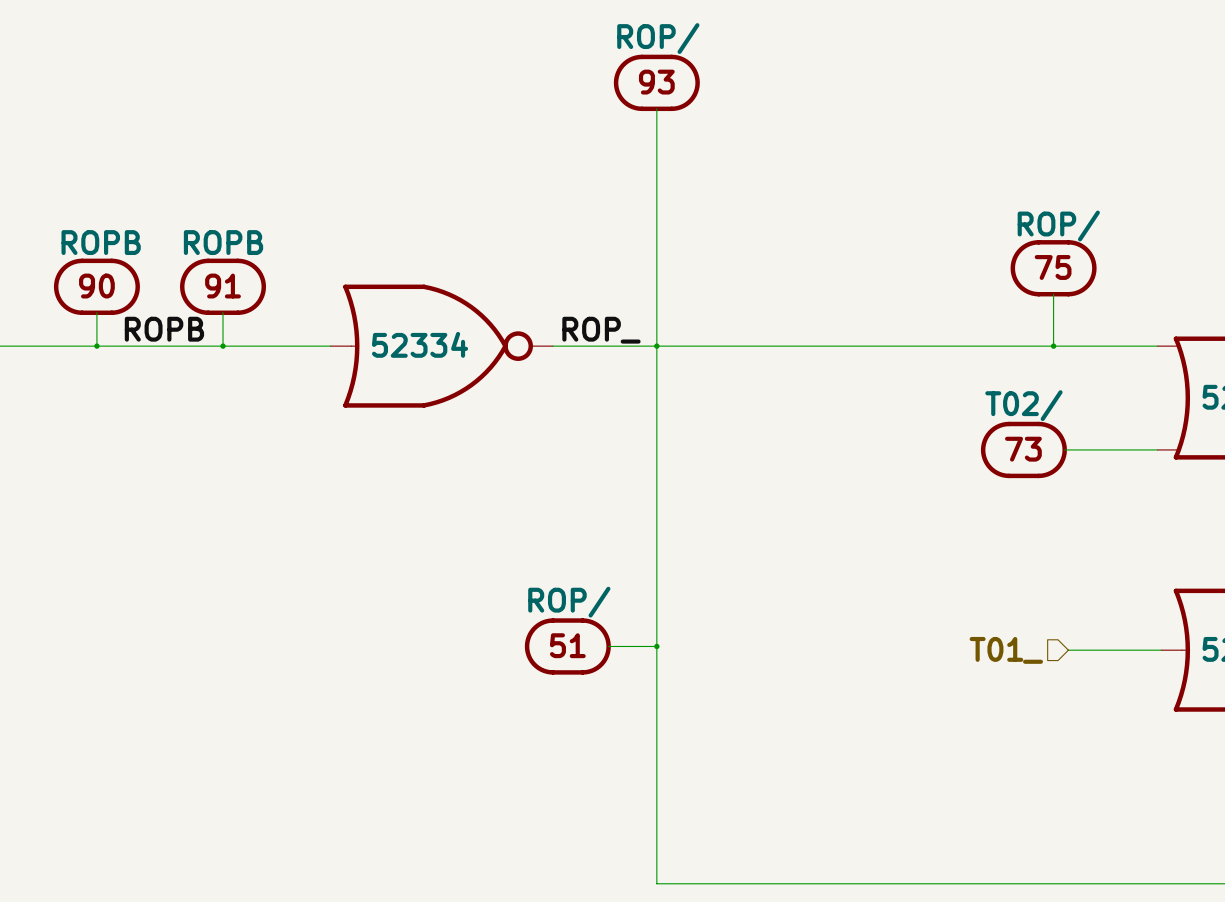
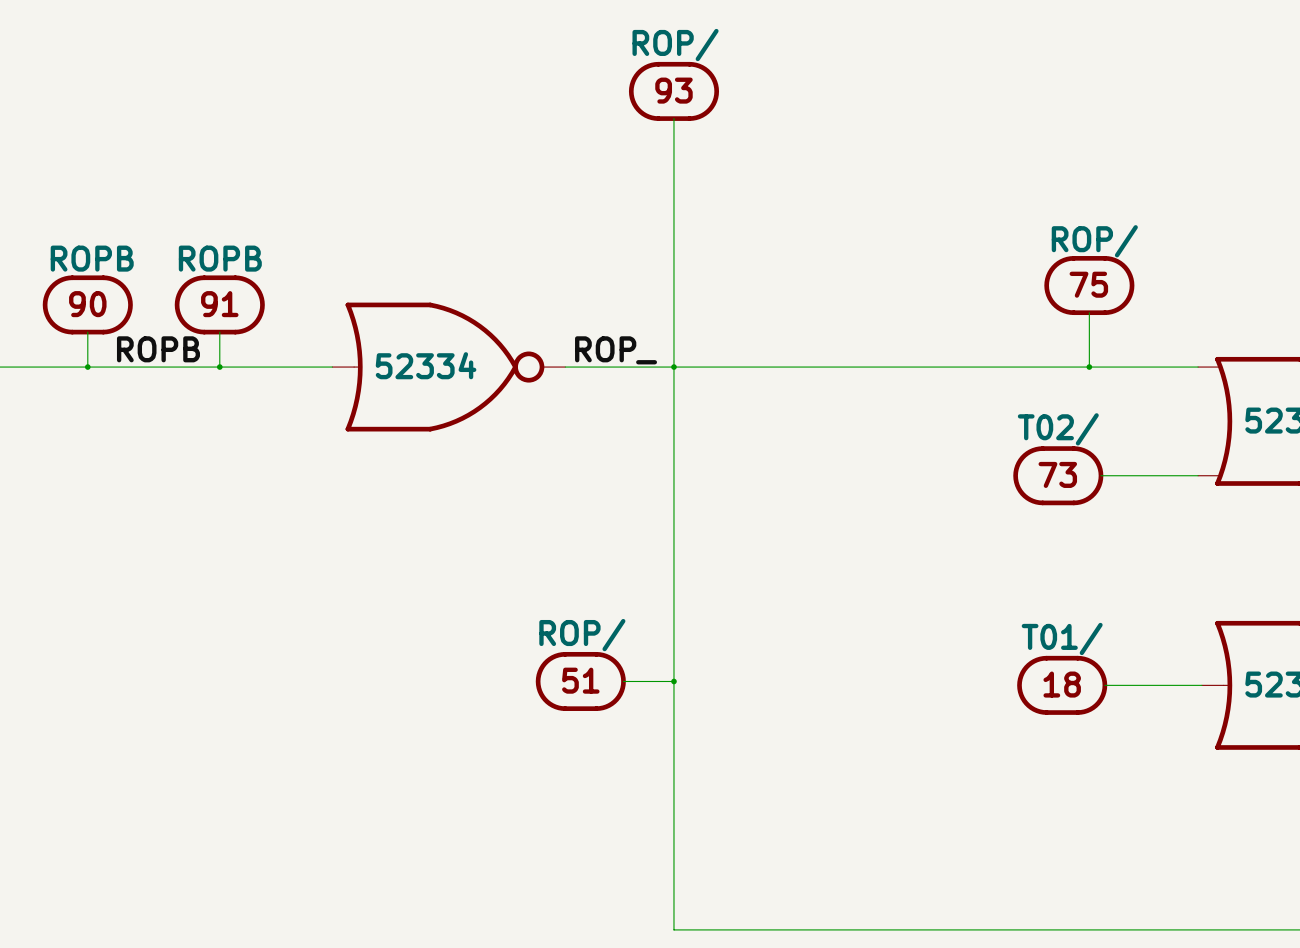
hierarchical label: T01_ (1006, 650) -> none
part: none -> (1062, 685)

